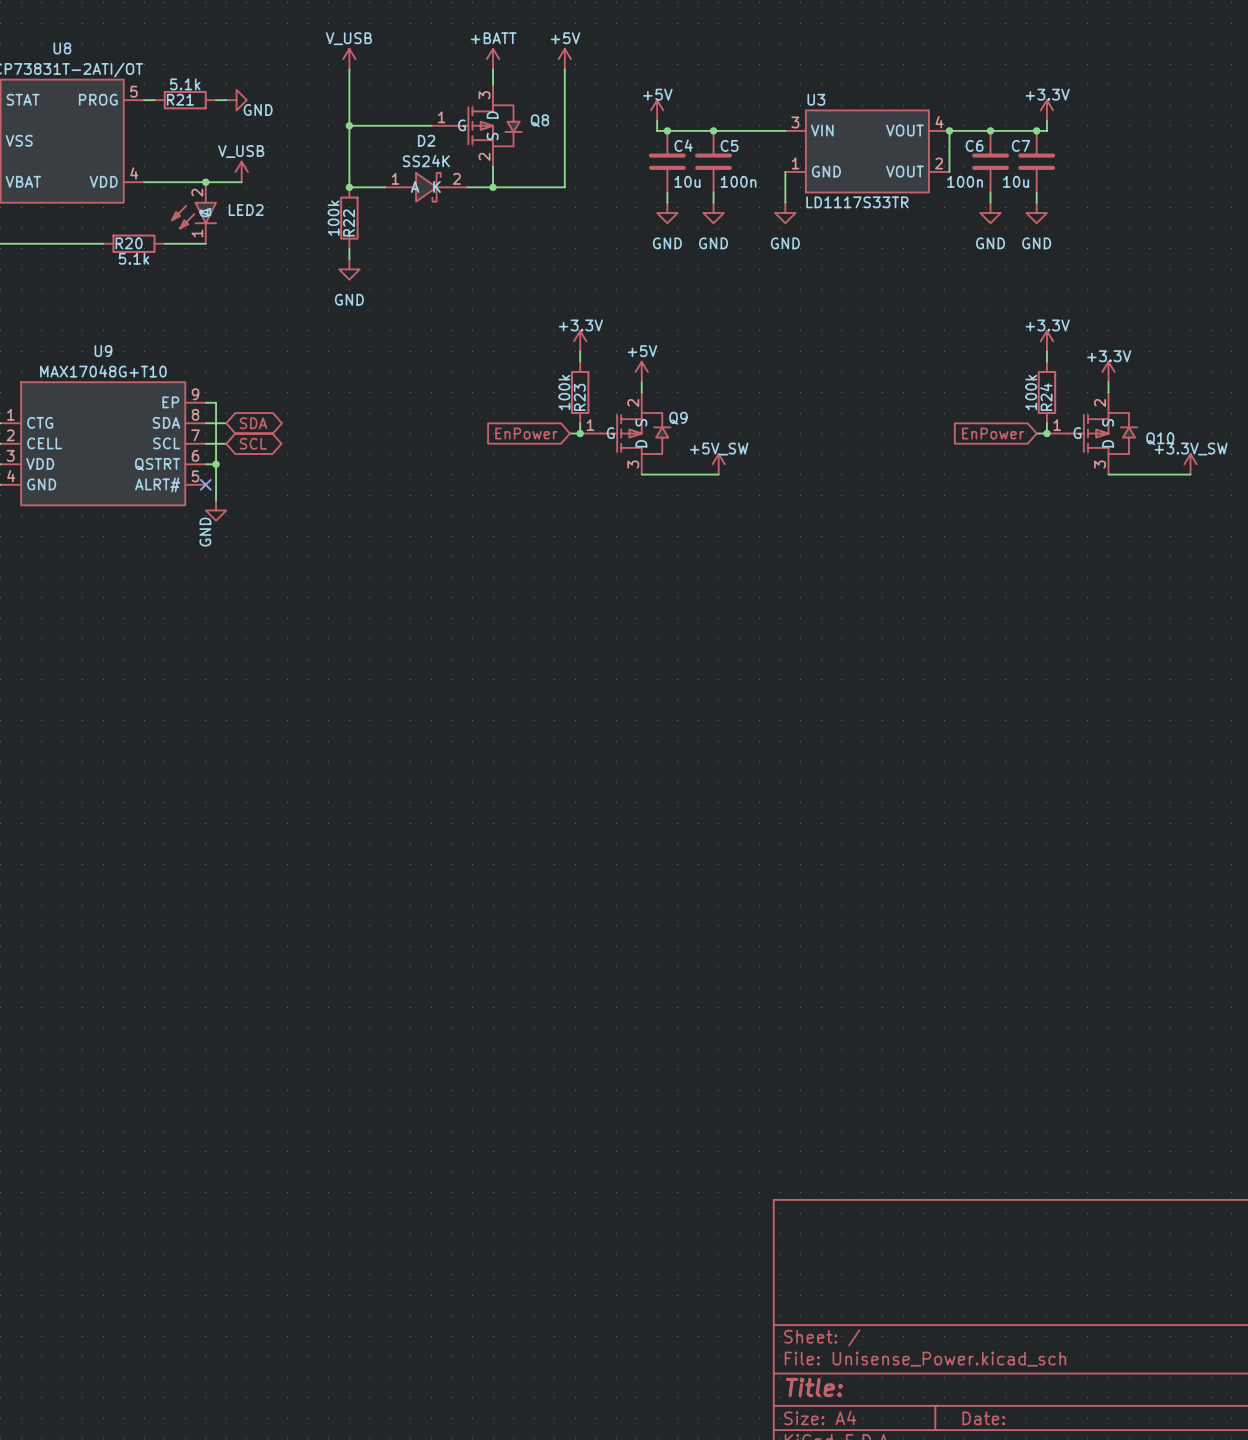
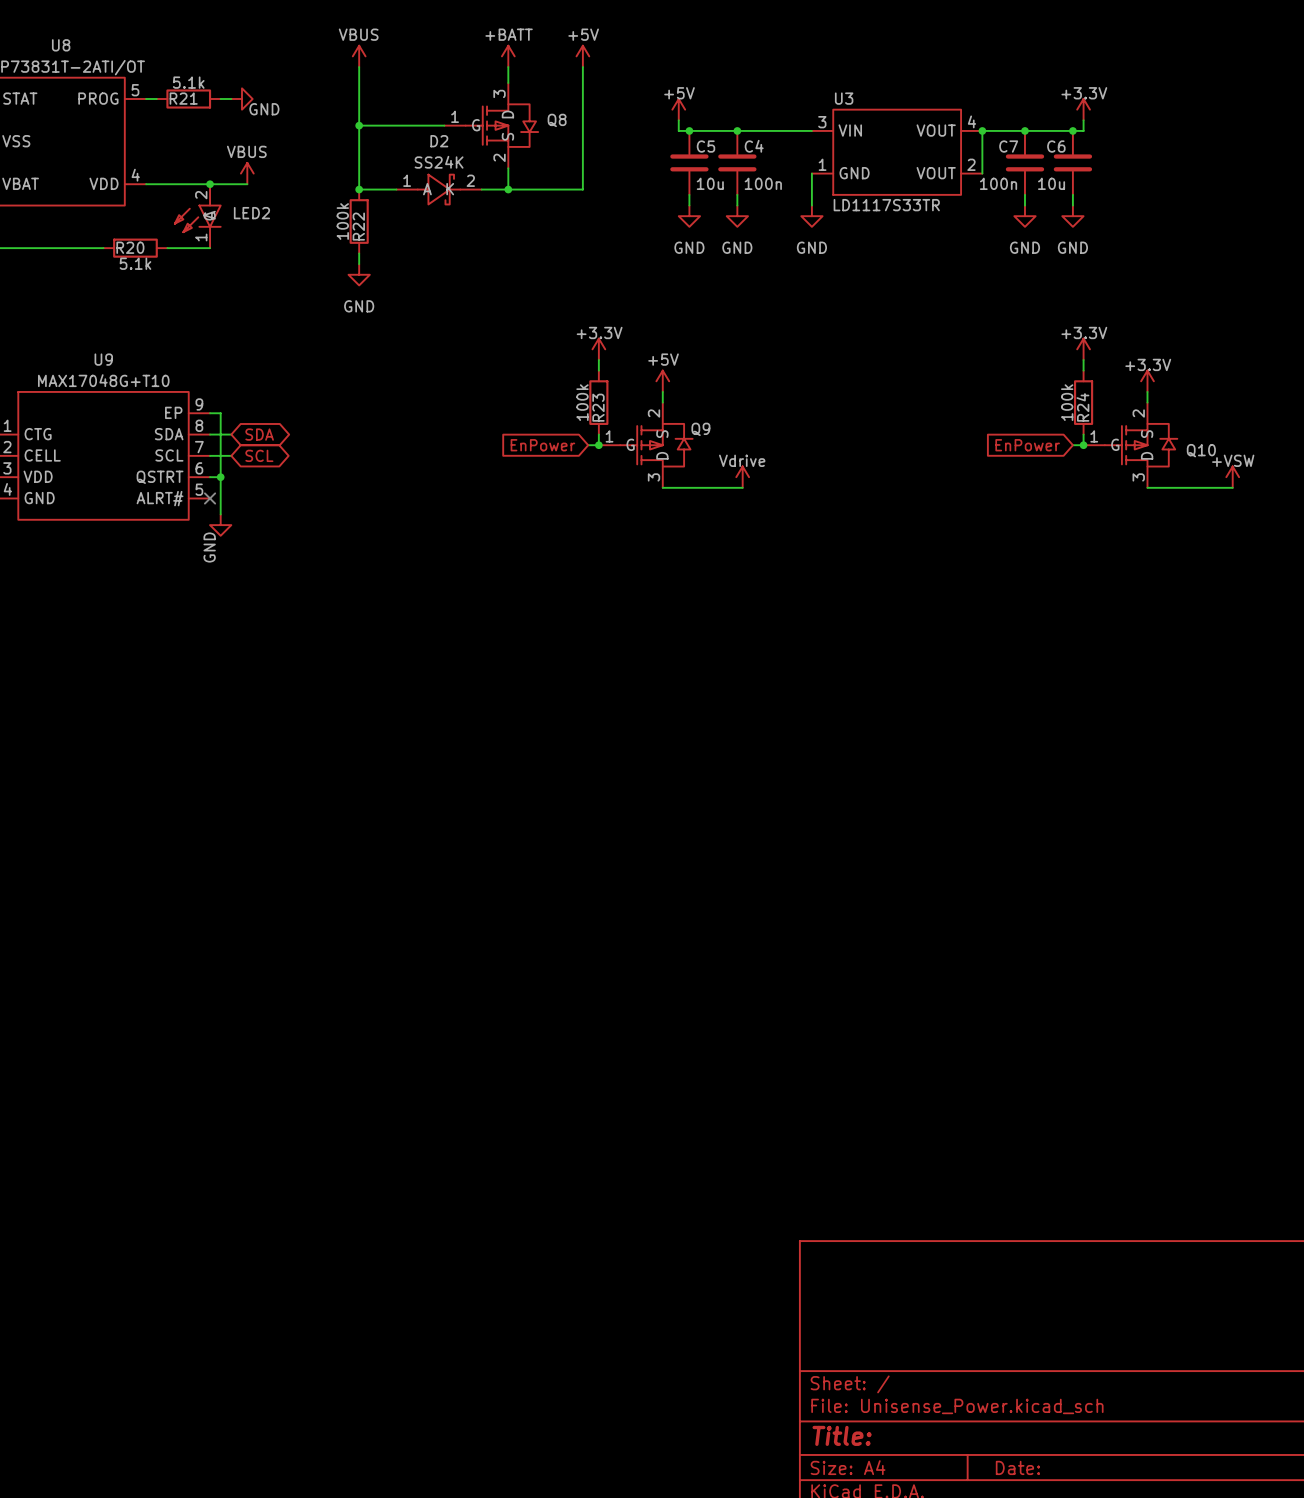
power symbol: V_USB (349, 59) -> VBUS (359, 56)
C4 name: C4 (683, 145) -> C5 (705, 146)
C5 name: C5 (729, 145) -> C4 (754, 146)
C6 name: C6 (974, 145) -> C7 (1008, 146)
C7 name: C7 (1020, 145) -> C6 (1056, 146)
power symbol: V_USB (241, 171) -> VBUS (247, 173)
power symbol: +5V_SW (718, 464) -> Vdrive (742, 477)
power symbol: +3.3V_SW (1190, 464) -> +VSW (1232, 477)

